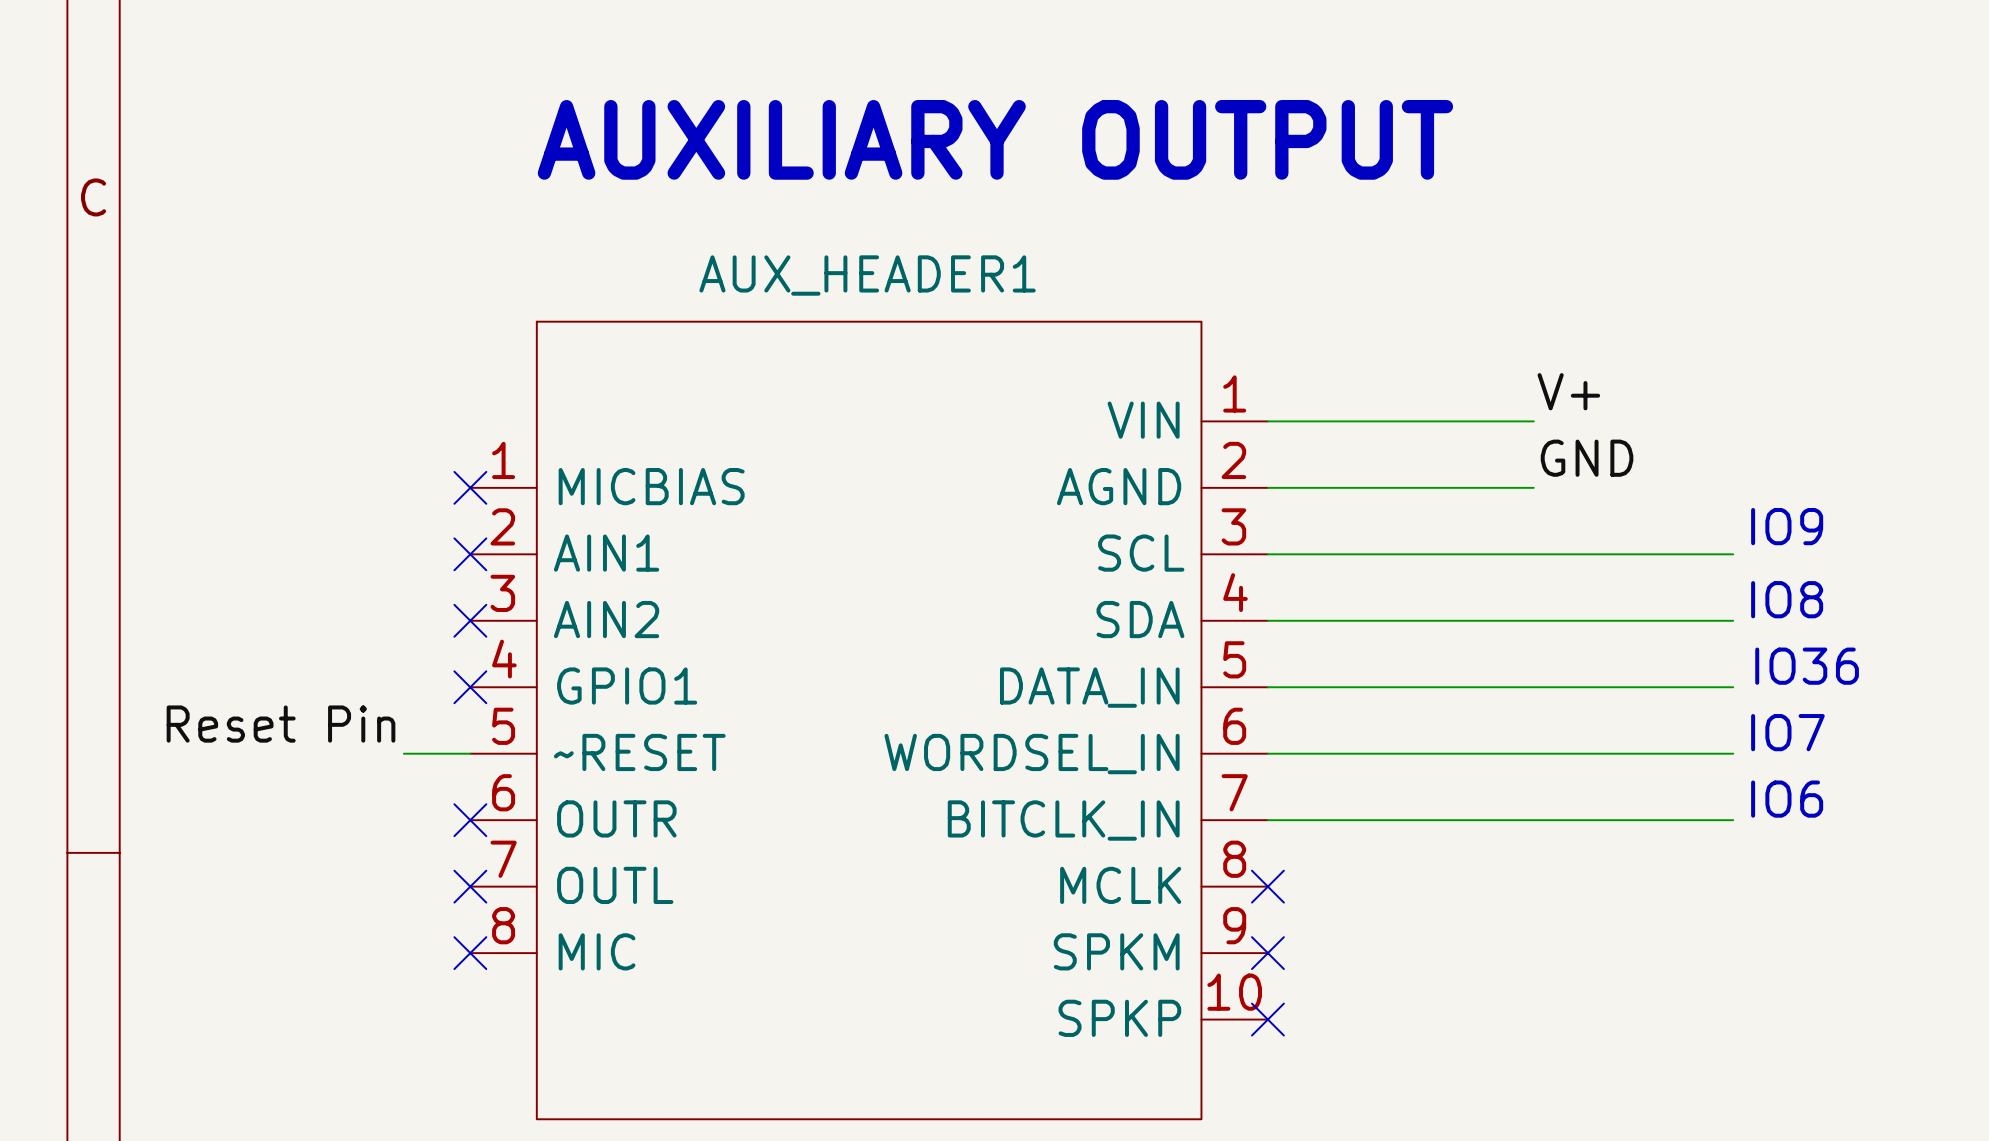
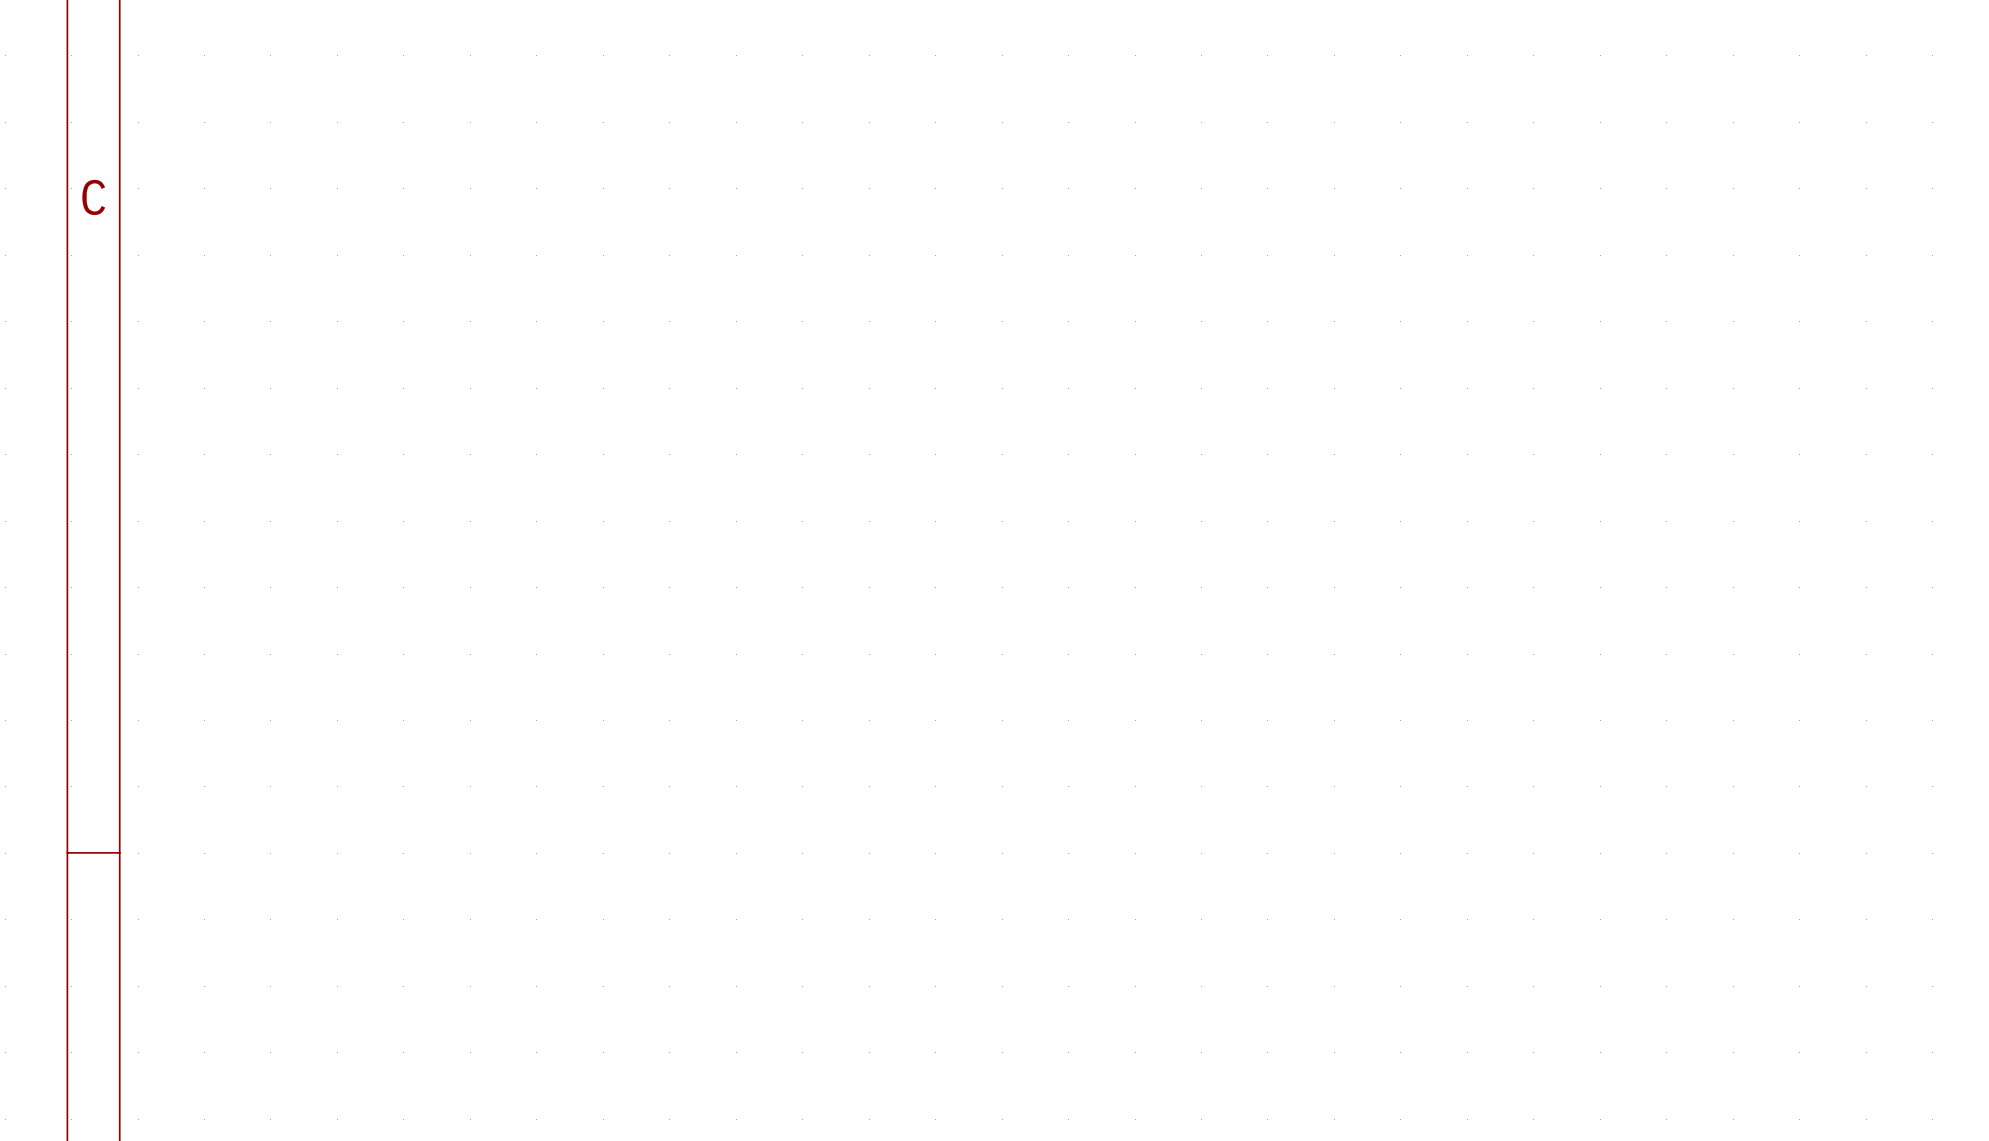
text: AUXILIARY OUTPUT (995, 139) -> none
label: V+ (1568, 391) -> none
wire: (1267, 421) (1533, 421) -> none
label: GND (1587, 458) -> none
no-connect mark: (470, 487) -> none
wire: (1267, 487) (1533, 487) -> none
text: IO9 (1787, 526) -> none
no-connect mark: (470, 554) -> none
wire: (1267, 554) (1733, 554) -> none
text: IO8 (1787, 599) -> none
no-connect mark: (470, 620) -> none
wire: (1267, 620) (1733, 620) -> none
text: IO36 (1807, 666) -> none
no-connect mark: (470, 687) -> none
wire: (1267, 687) (1733, 687) -> none
AUX_HEADER1: (869, 720) -> none
label: Reset Pin (281, 724) -> none
text: IO7 (1787, 732) -> none
wire: (403, 753) (470, 753) -> none
wire: (1267, 753) (1733, 753) -> none
text: IO6 (1787, 799) -> none
no-connect mark: (470, 820) -> none
wire: (1267, 820) (1733, 820) -> none
no-connect mark: (470, 886) -> none
no-connect mark: (1267, 886) -> none
no-connect mark: (470, 953) -> none
no-connect mark: (1267, 953) -> none
no-connect mark: (1267, 1019) -> none

